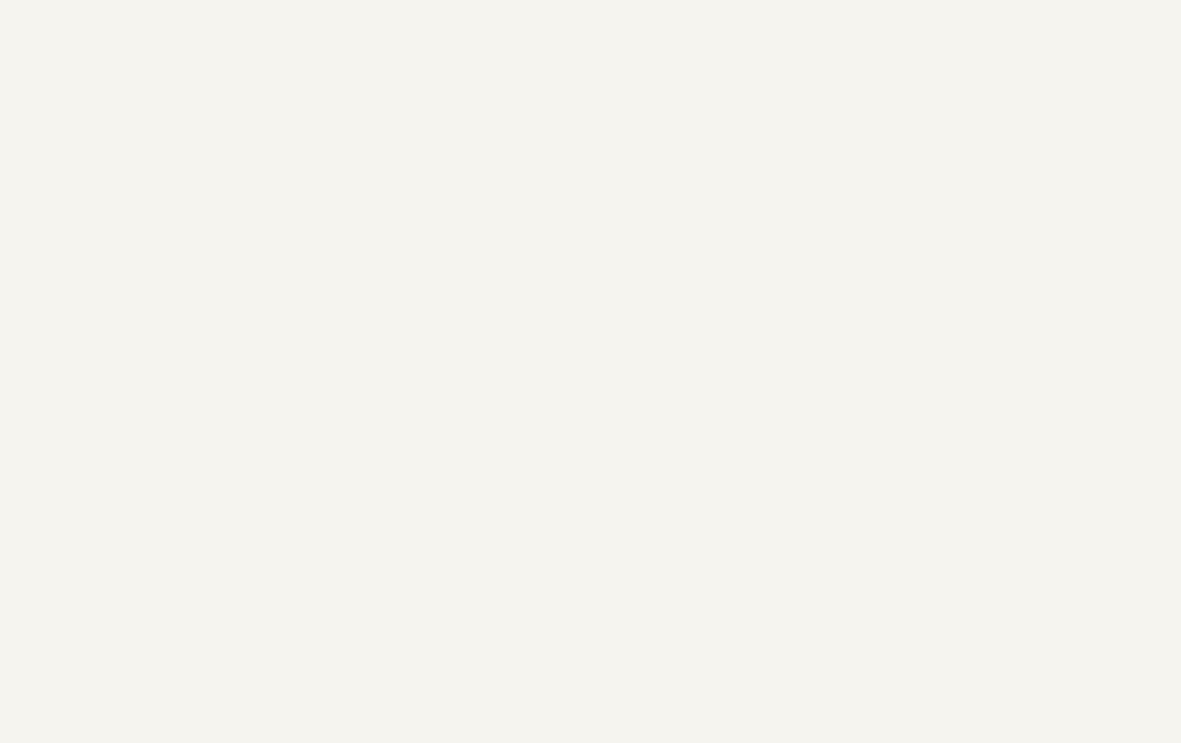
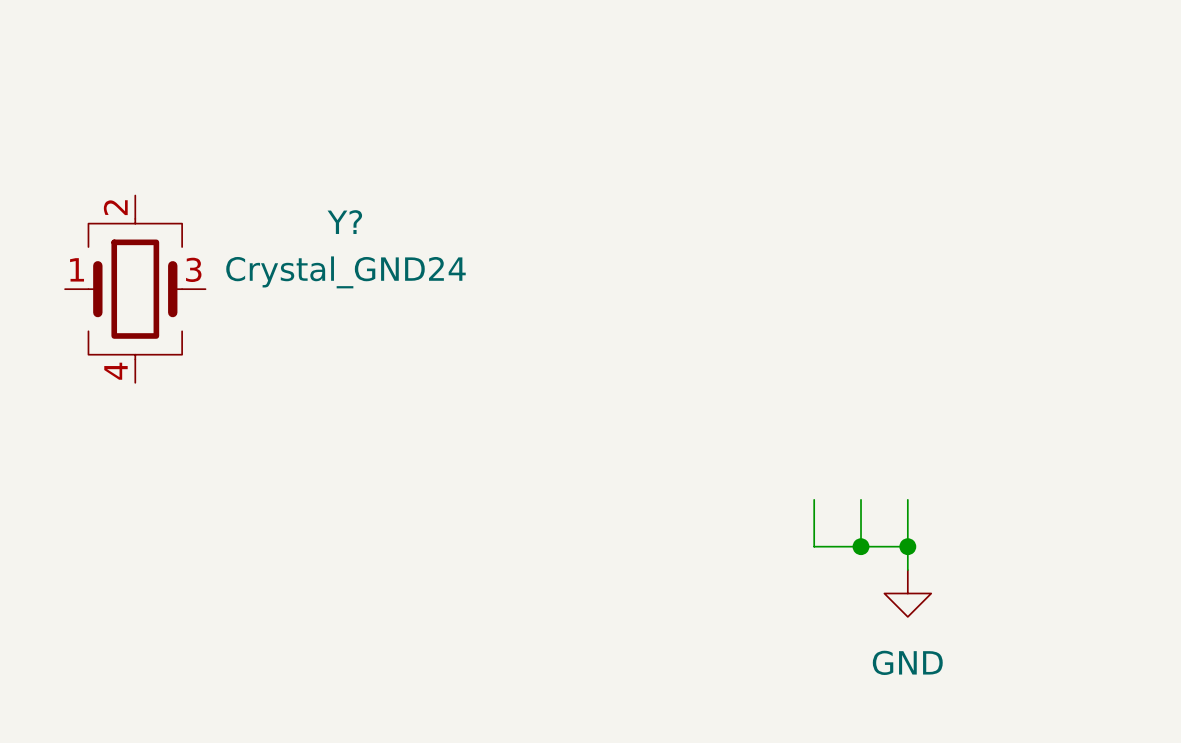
Y?: none -> Crystal_GND24 (135, 289)
wire: none -> (814, 499) (814, 546) (907, 546)
wire: none -> (861, 499) (861, 546)
wire: none -> (907, 499) (907, 570)
junction: none -> (861, 546)
junction: none -> (907, 546)
power symbol: none -> GND (907, 593)

